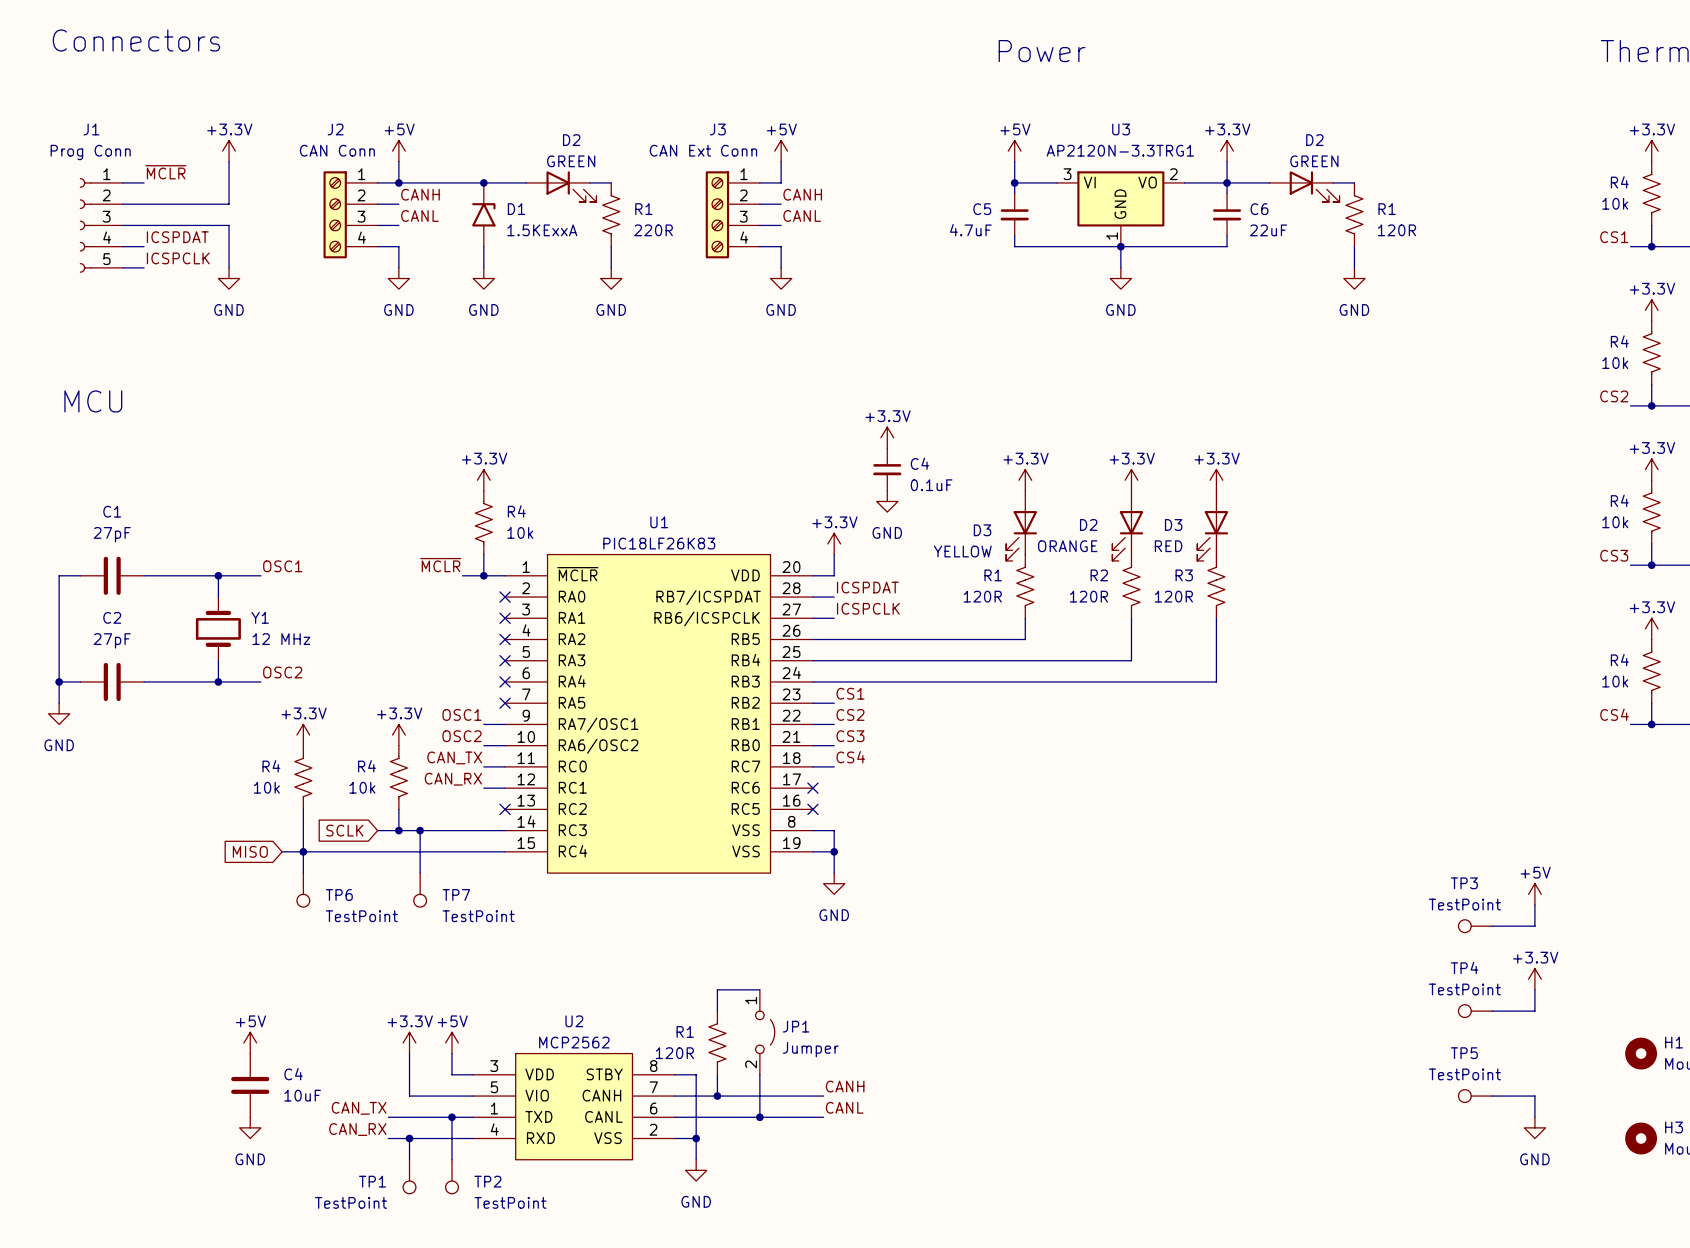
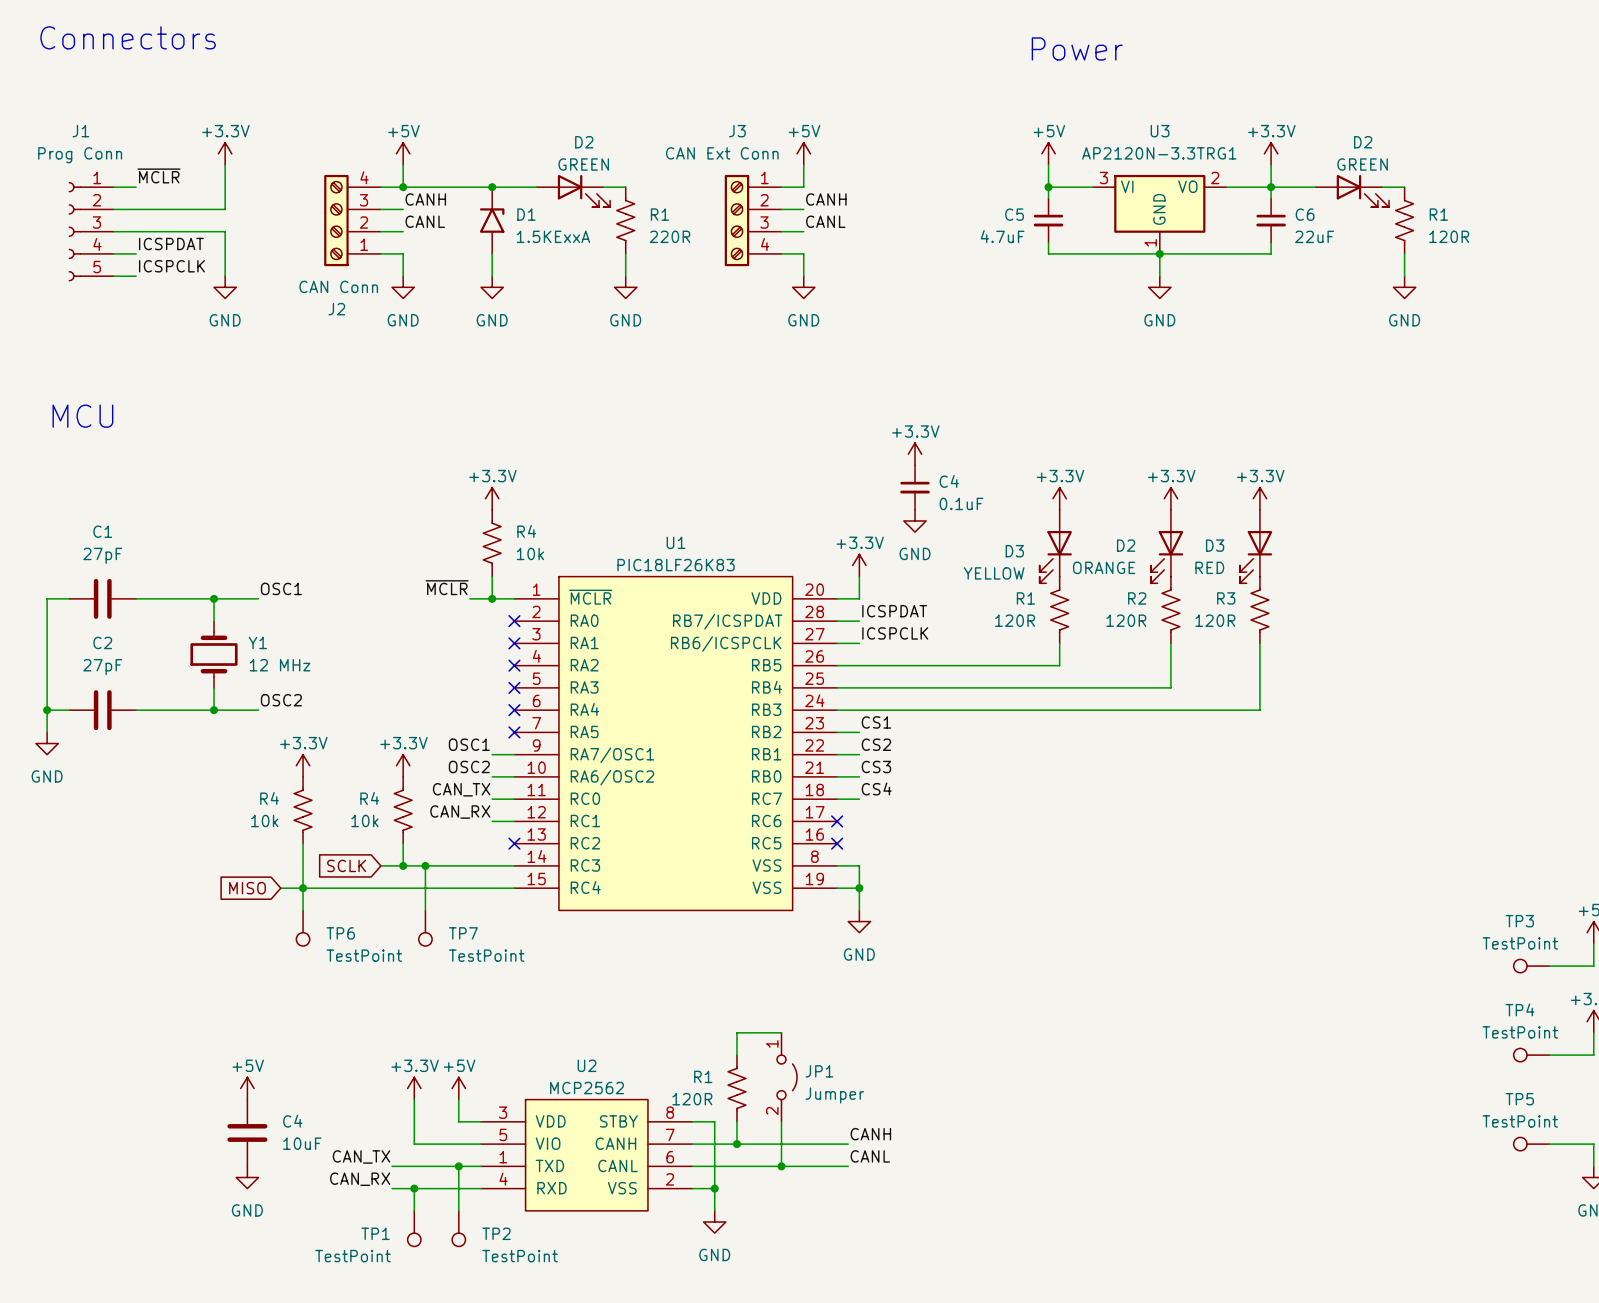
J2 flip: as is (335, 214) -> up-down (336, 220)

